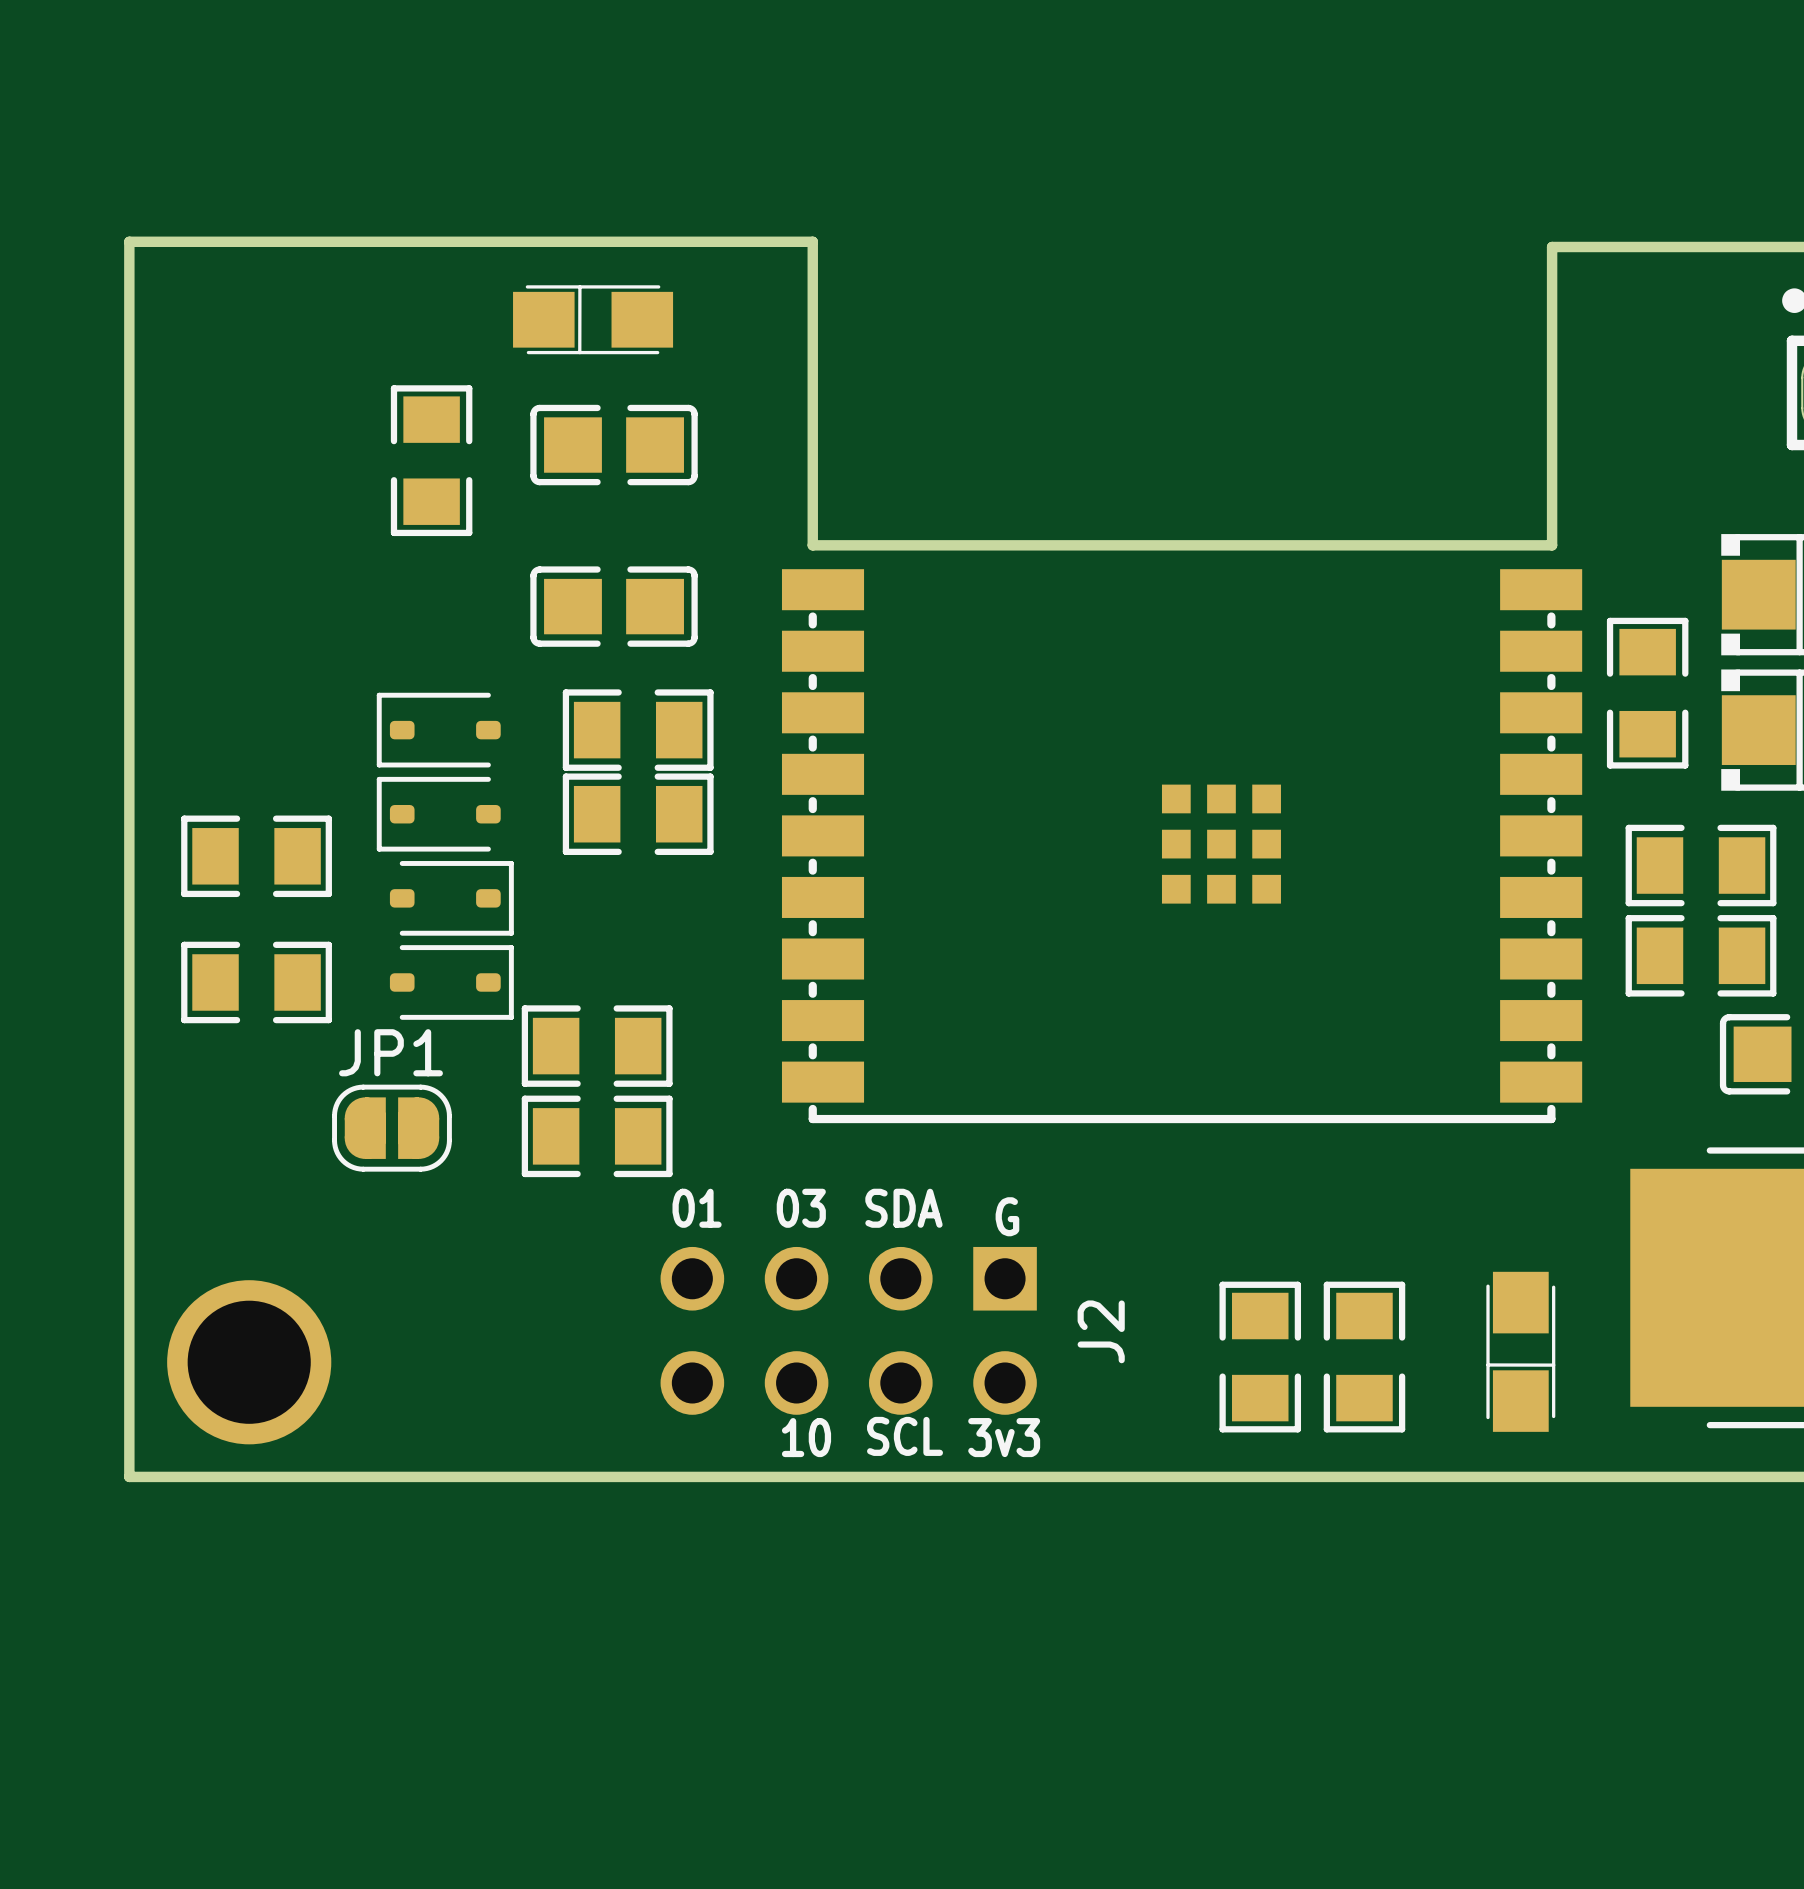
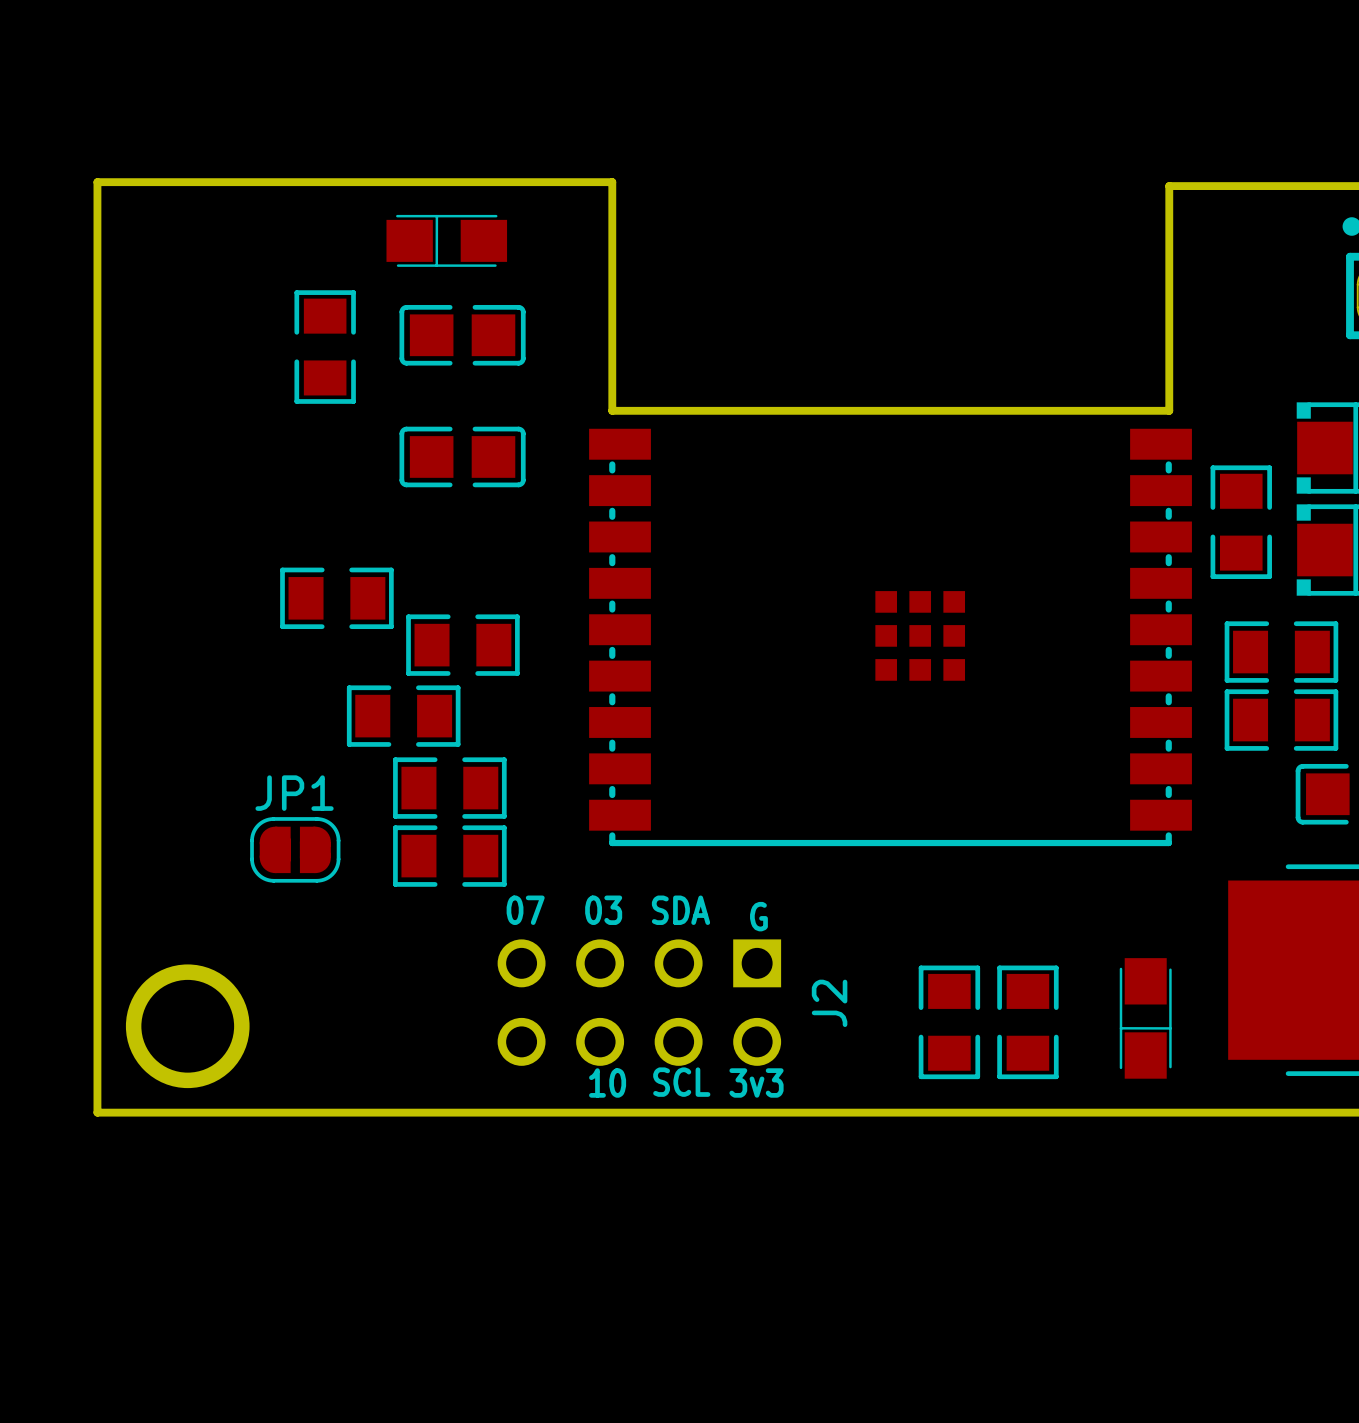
part: (438, 730) -> none
part: (638, 730) -> none
part footprint: [376, 776, 501, 852] -> [280, 567, 394, 630]
part position: (638, 814) -> (462, 645)
part: (256, 856) -> none
part: (451, 898) -> none
part: none -> (403, 716)
part: (256, 982) -> none
part: (451, 982) -> none
text: 01 (697, 1208) -> 07 (525, 910)

